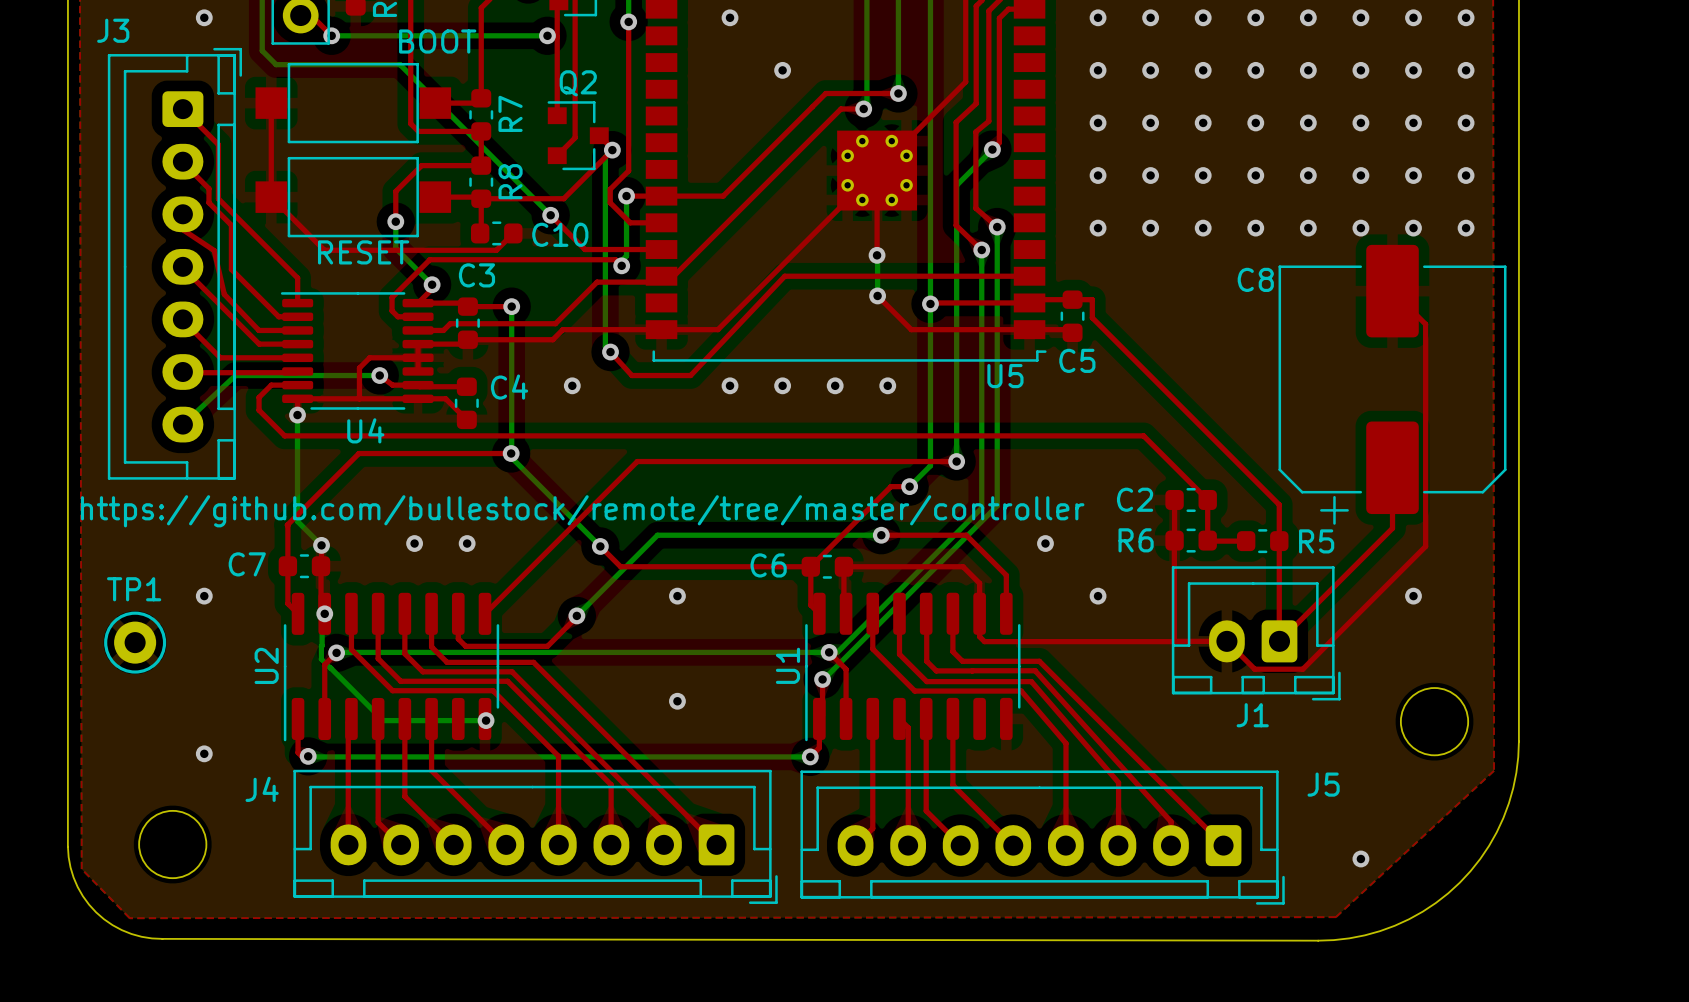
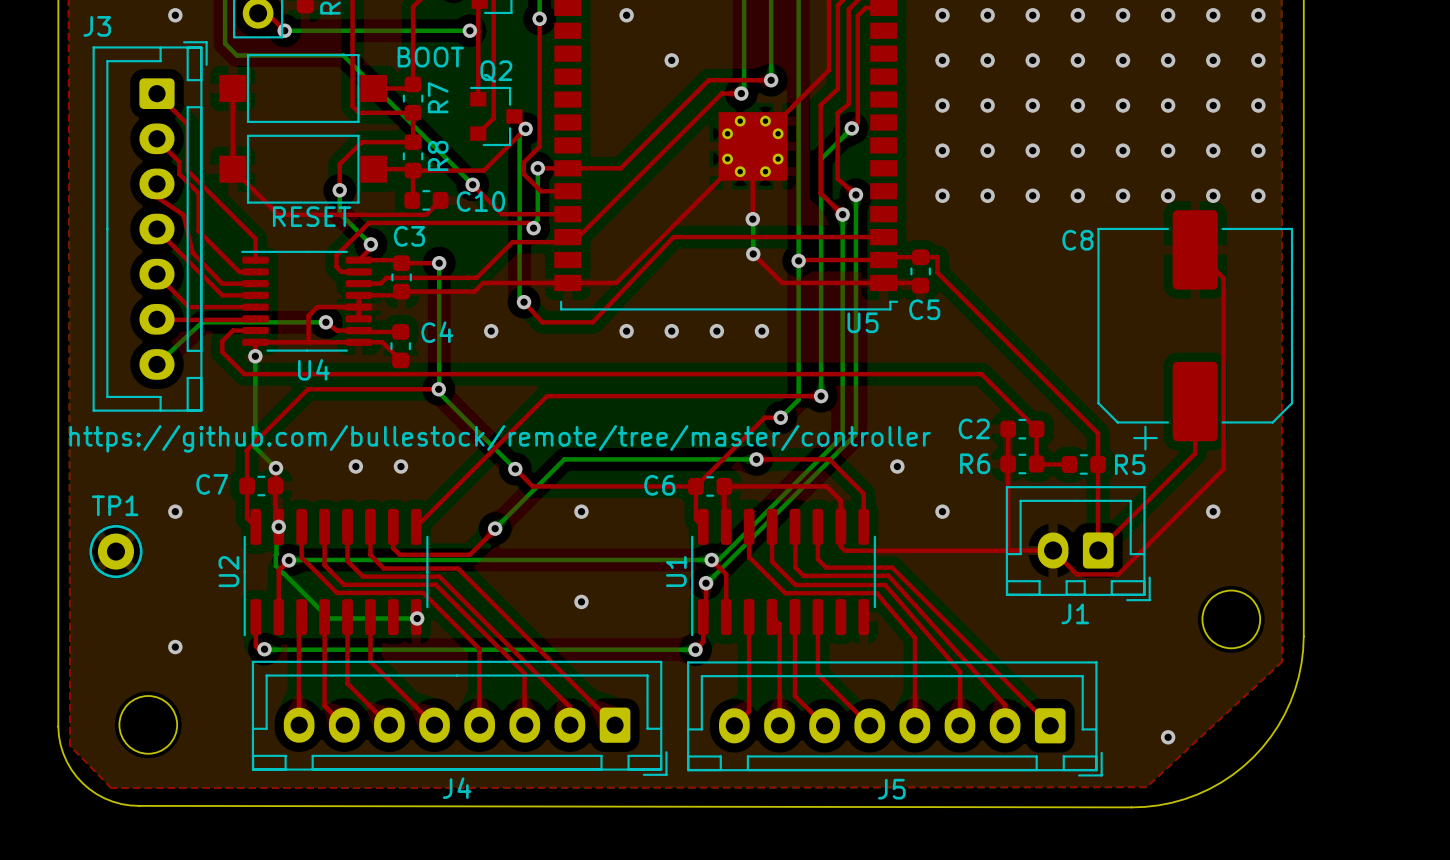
text position: BOOT (437, 41) -> BOOT (430, 57)
J5 name position: J5 (1323, 784) -> J5 (891, 789)
J4 name position: J4 (262, 789) -> J4 (457, 788)

